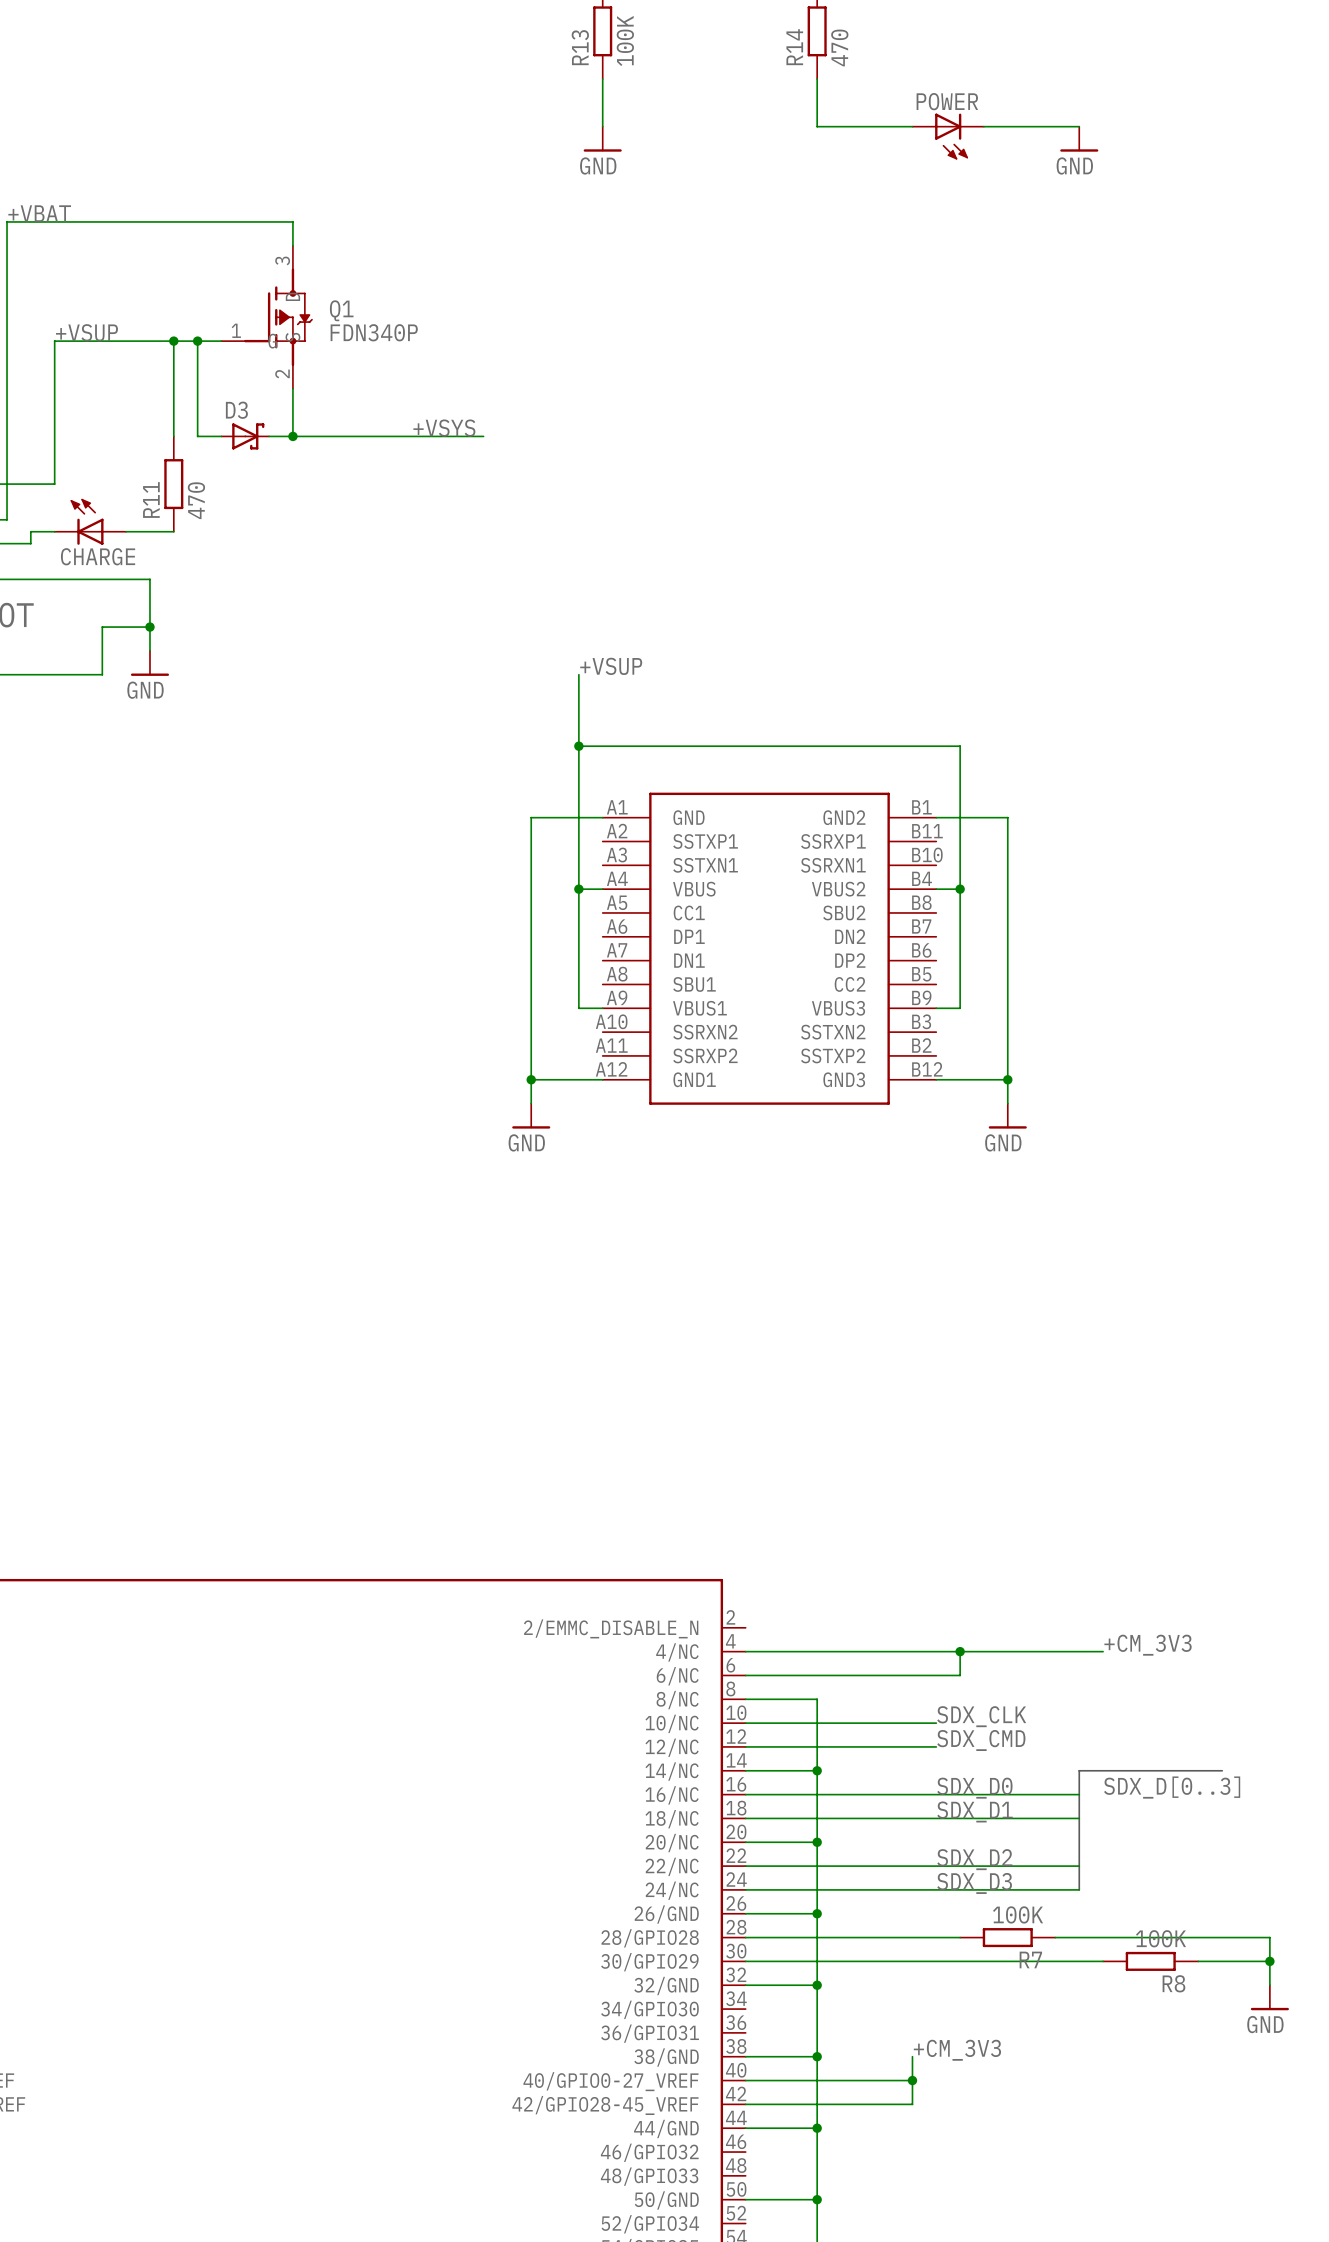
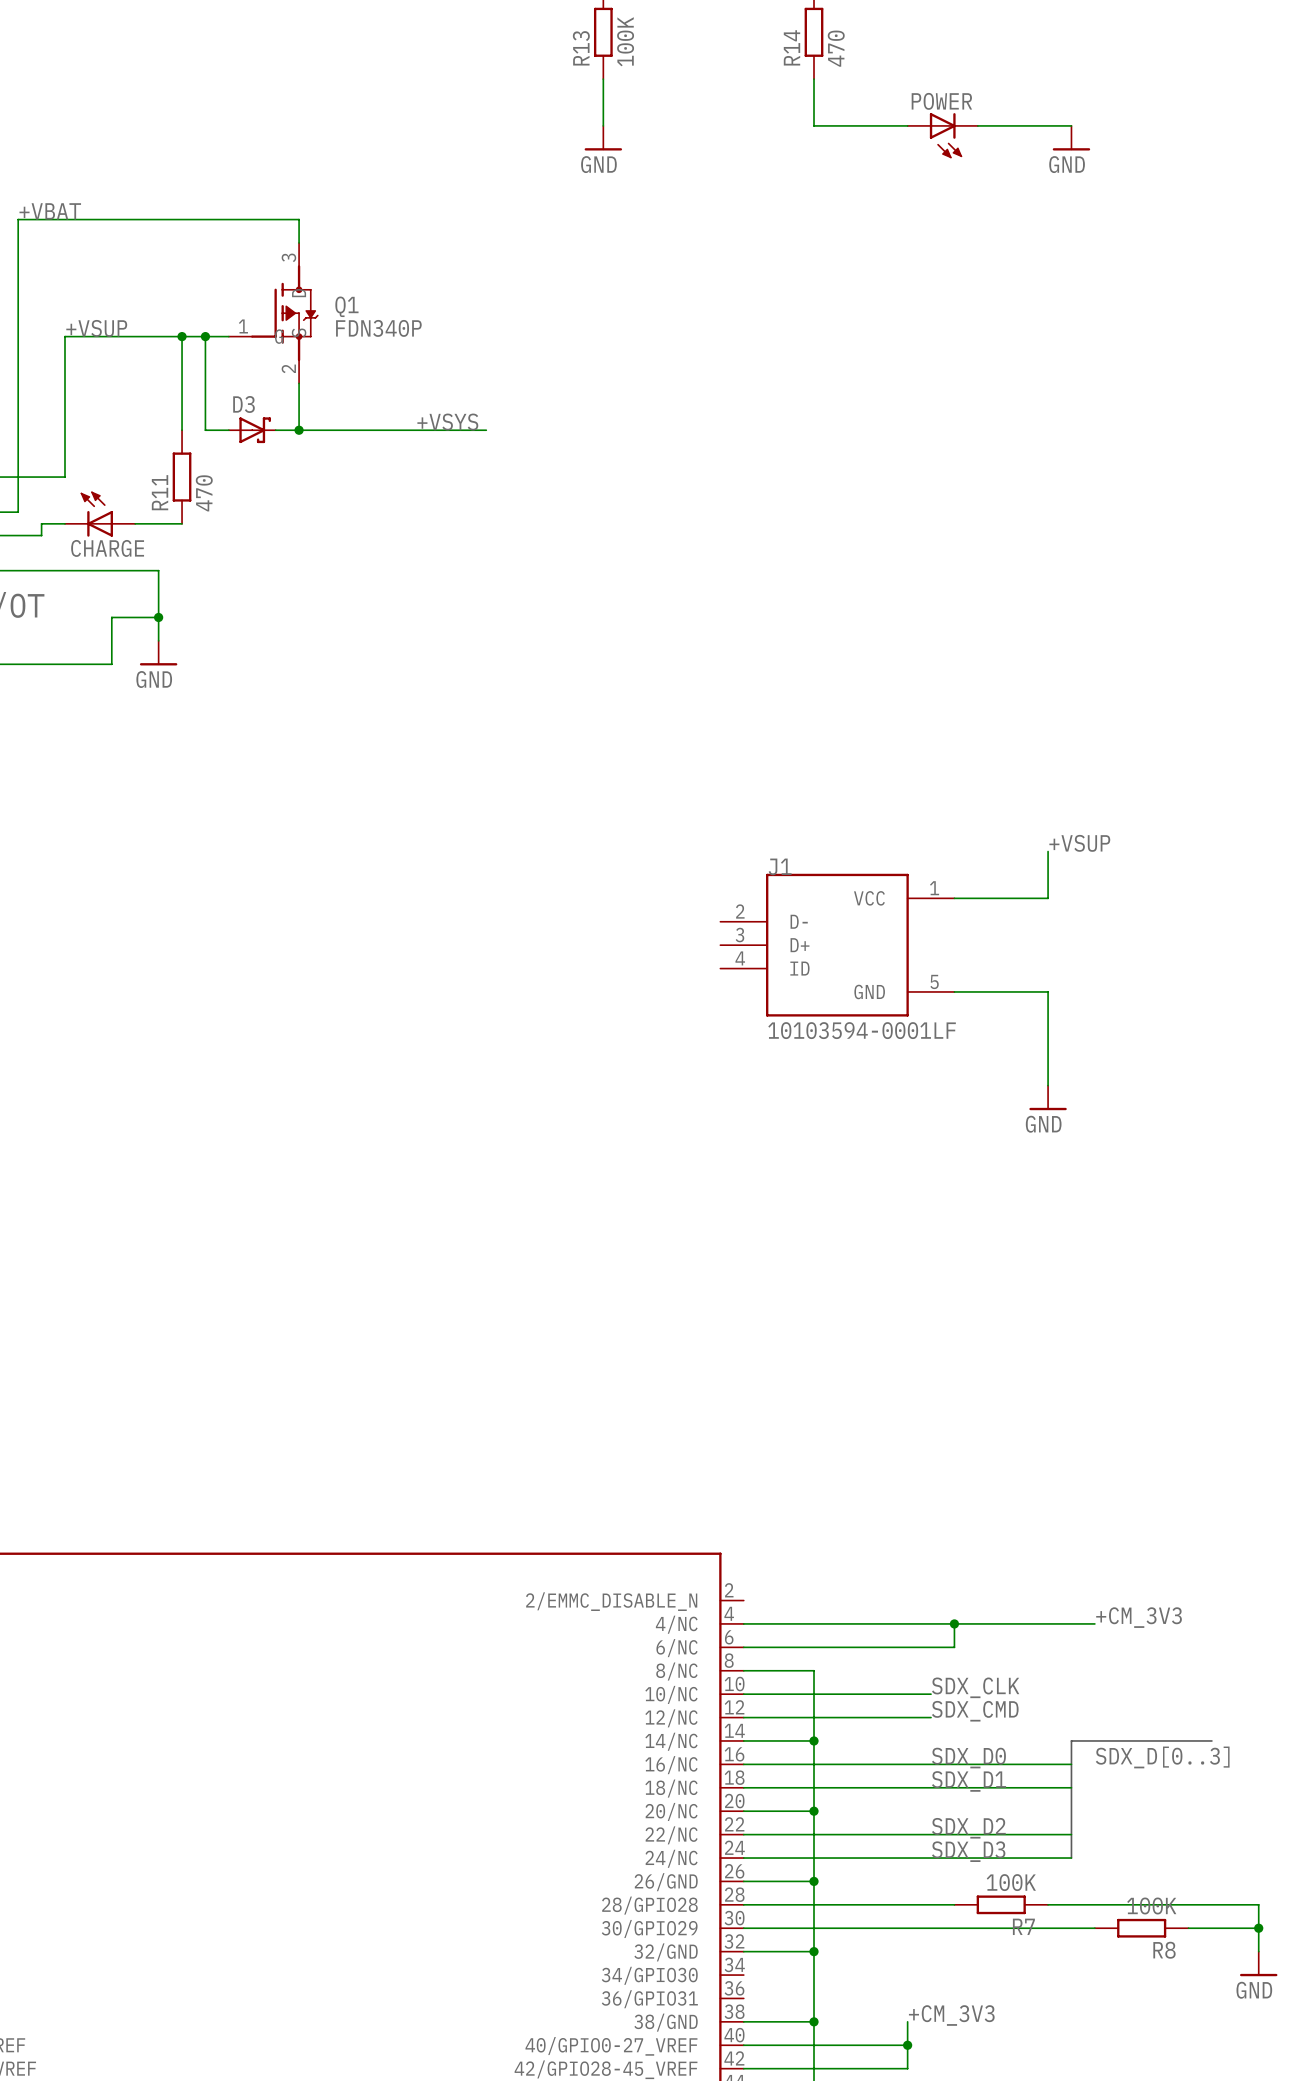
label: +VSUP (611, 666) -> none
wire: (578, 674) (578, 1008) (602, 1008) -> none
wire: (578, 746) (960, 746) (960, 1008) (936, 1008) -> none
junction: (578, 746) -> none
wire: (602, 817) (531, 817) (531, 1103) -> none
wire: (936, 817) (1007, 817) (1007, 1103) -> none
label: none -> +VSUP (1079, 843)
wire: none -> (1048, 851) (1048, 898) (954, 898)
wire: (578, 889) (602, 889) -> none
junction: (578, 889) -> none
wire: (936, 889) (960, 889) -> none
junction: (960, 889) -> none
part: (769, 948) -> none
J1: none -> 10103594-0001LF (837, 945)
wire: none -> (954, 991) (1048, 991) (1048, 1085)
wire: (531, 1079) (602, 1079) -> none
junction: (531, 1079) -> none
wire: (936, 1079) (1007, 1079) -> none
junction: (1007, 1079) -> none
power symbol: GND (531, 1116) -> none
power symbol position: GND (1007, 1116) -> GND (1048, 1097)

